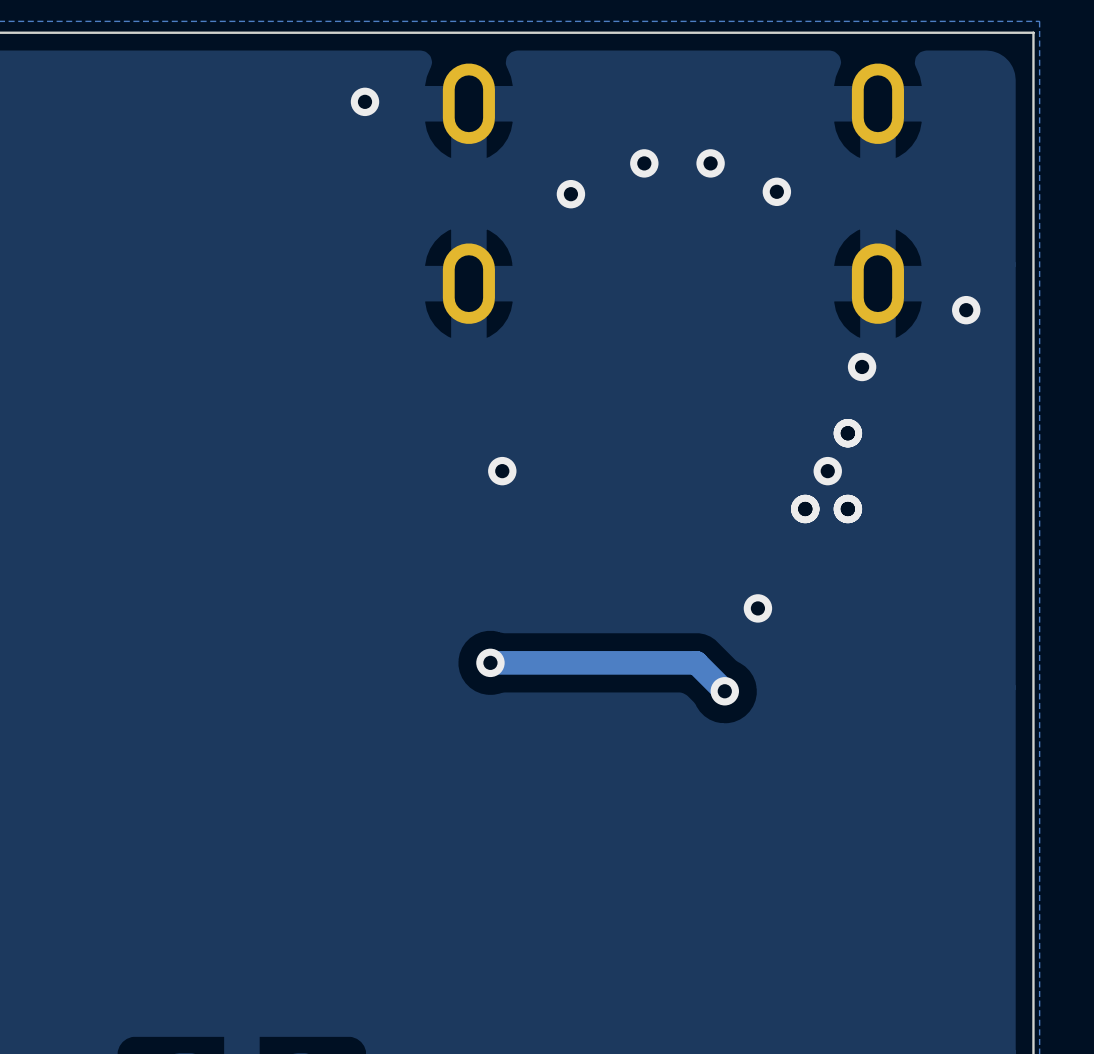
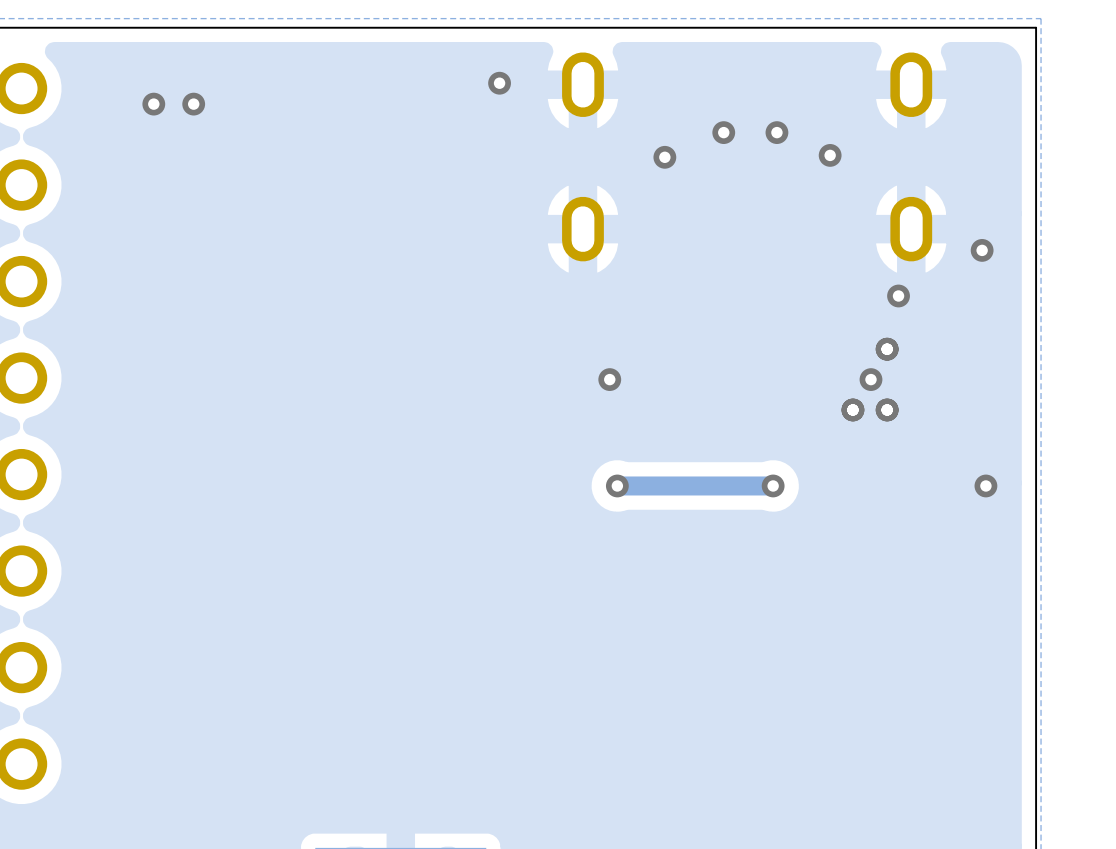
track: none -> (773, 485) (617, 485)
via: none -> (773, 485)
via: none -> (985, 485)
via: (757, 608) -> none
track: (490, 662) (696, 662) (724, 691) -> none
via position: (490, 662) -> (617, 485)
via: (724, 691) -> none

